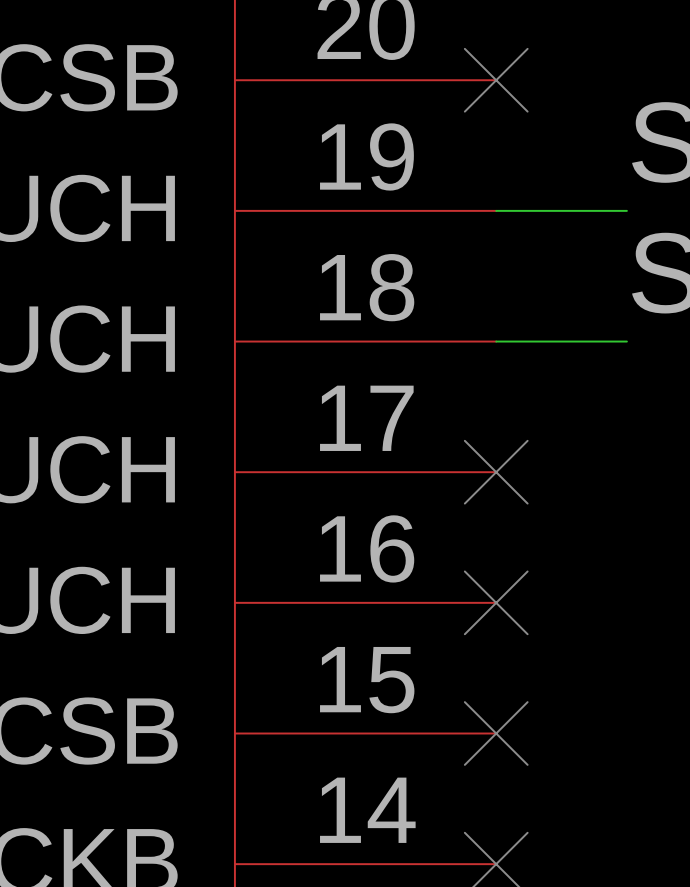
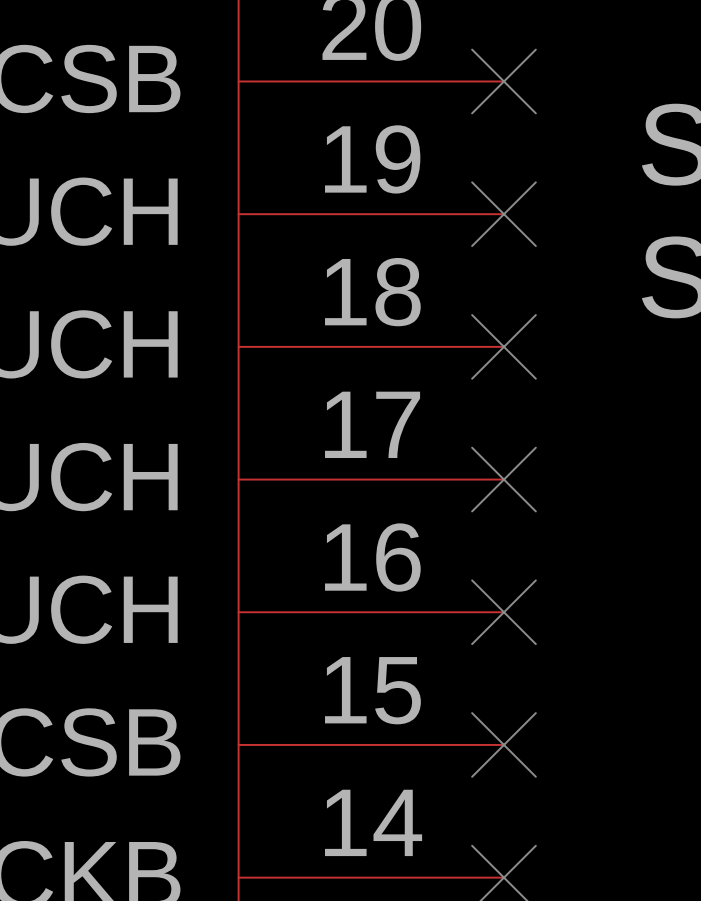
wire: (496, 210) (626, 210) -> none
no-connect mark: none -> (503, 214)
wire: (496, 341) (626, 341) -> none
no-connect mark: none -> (503, 346)

